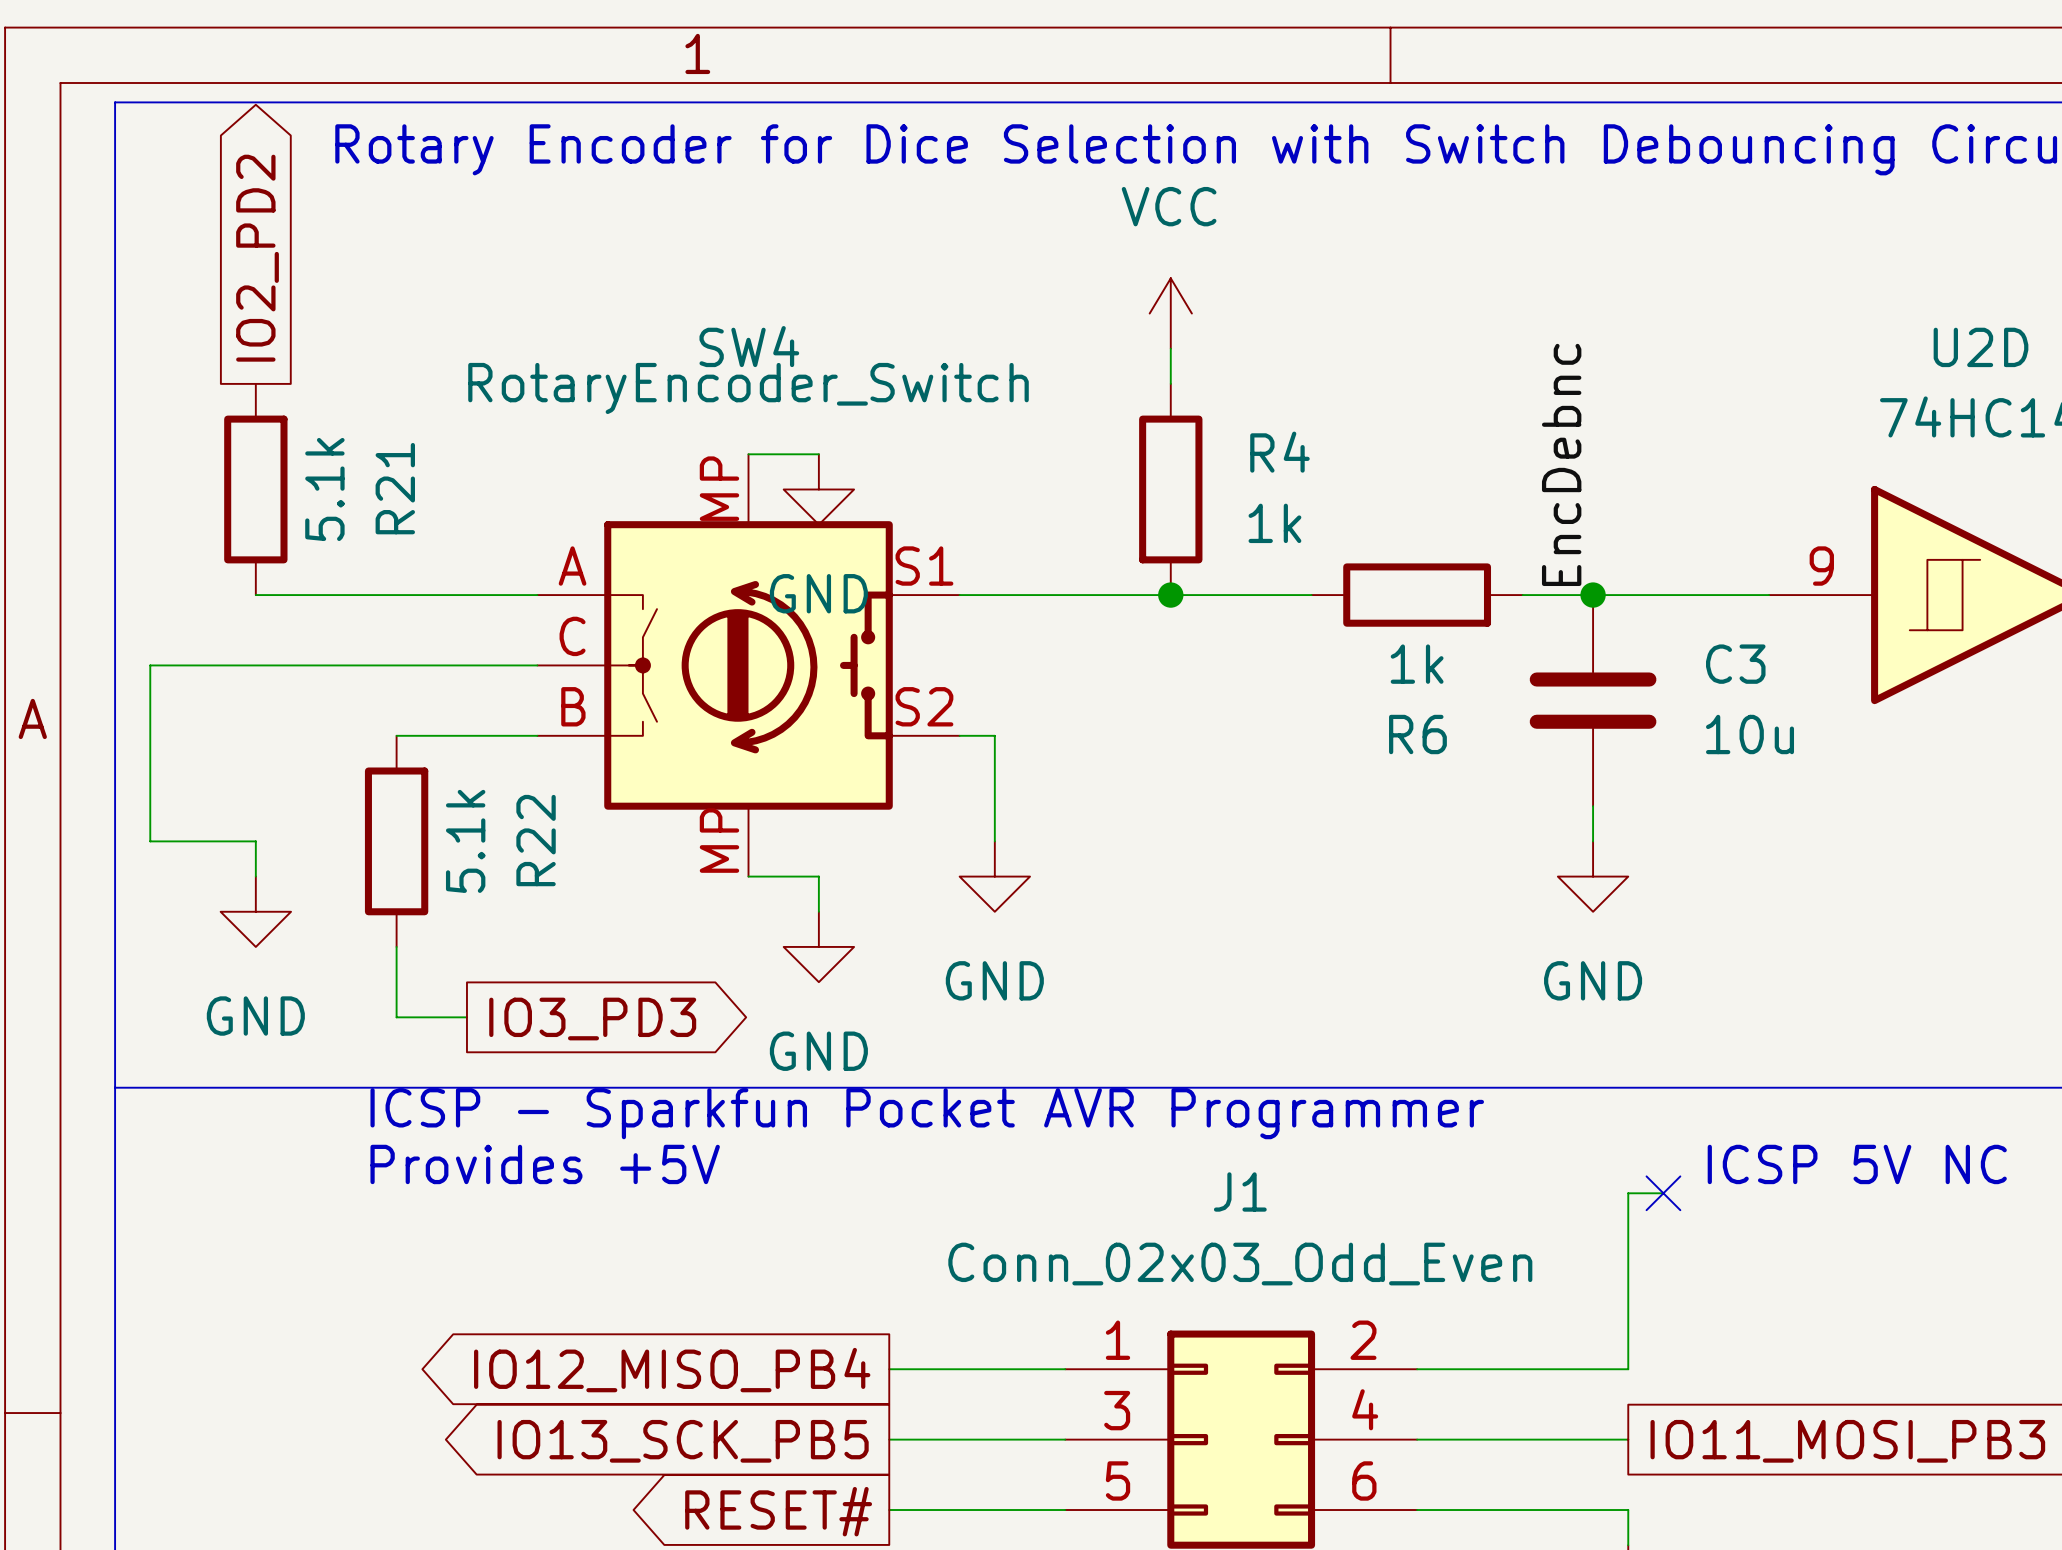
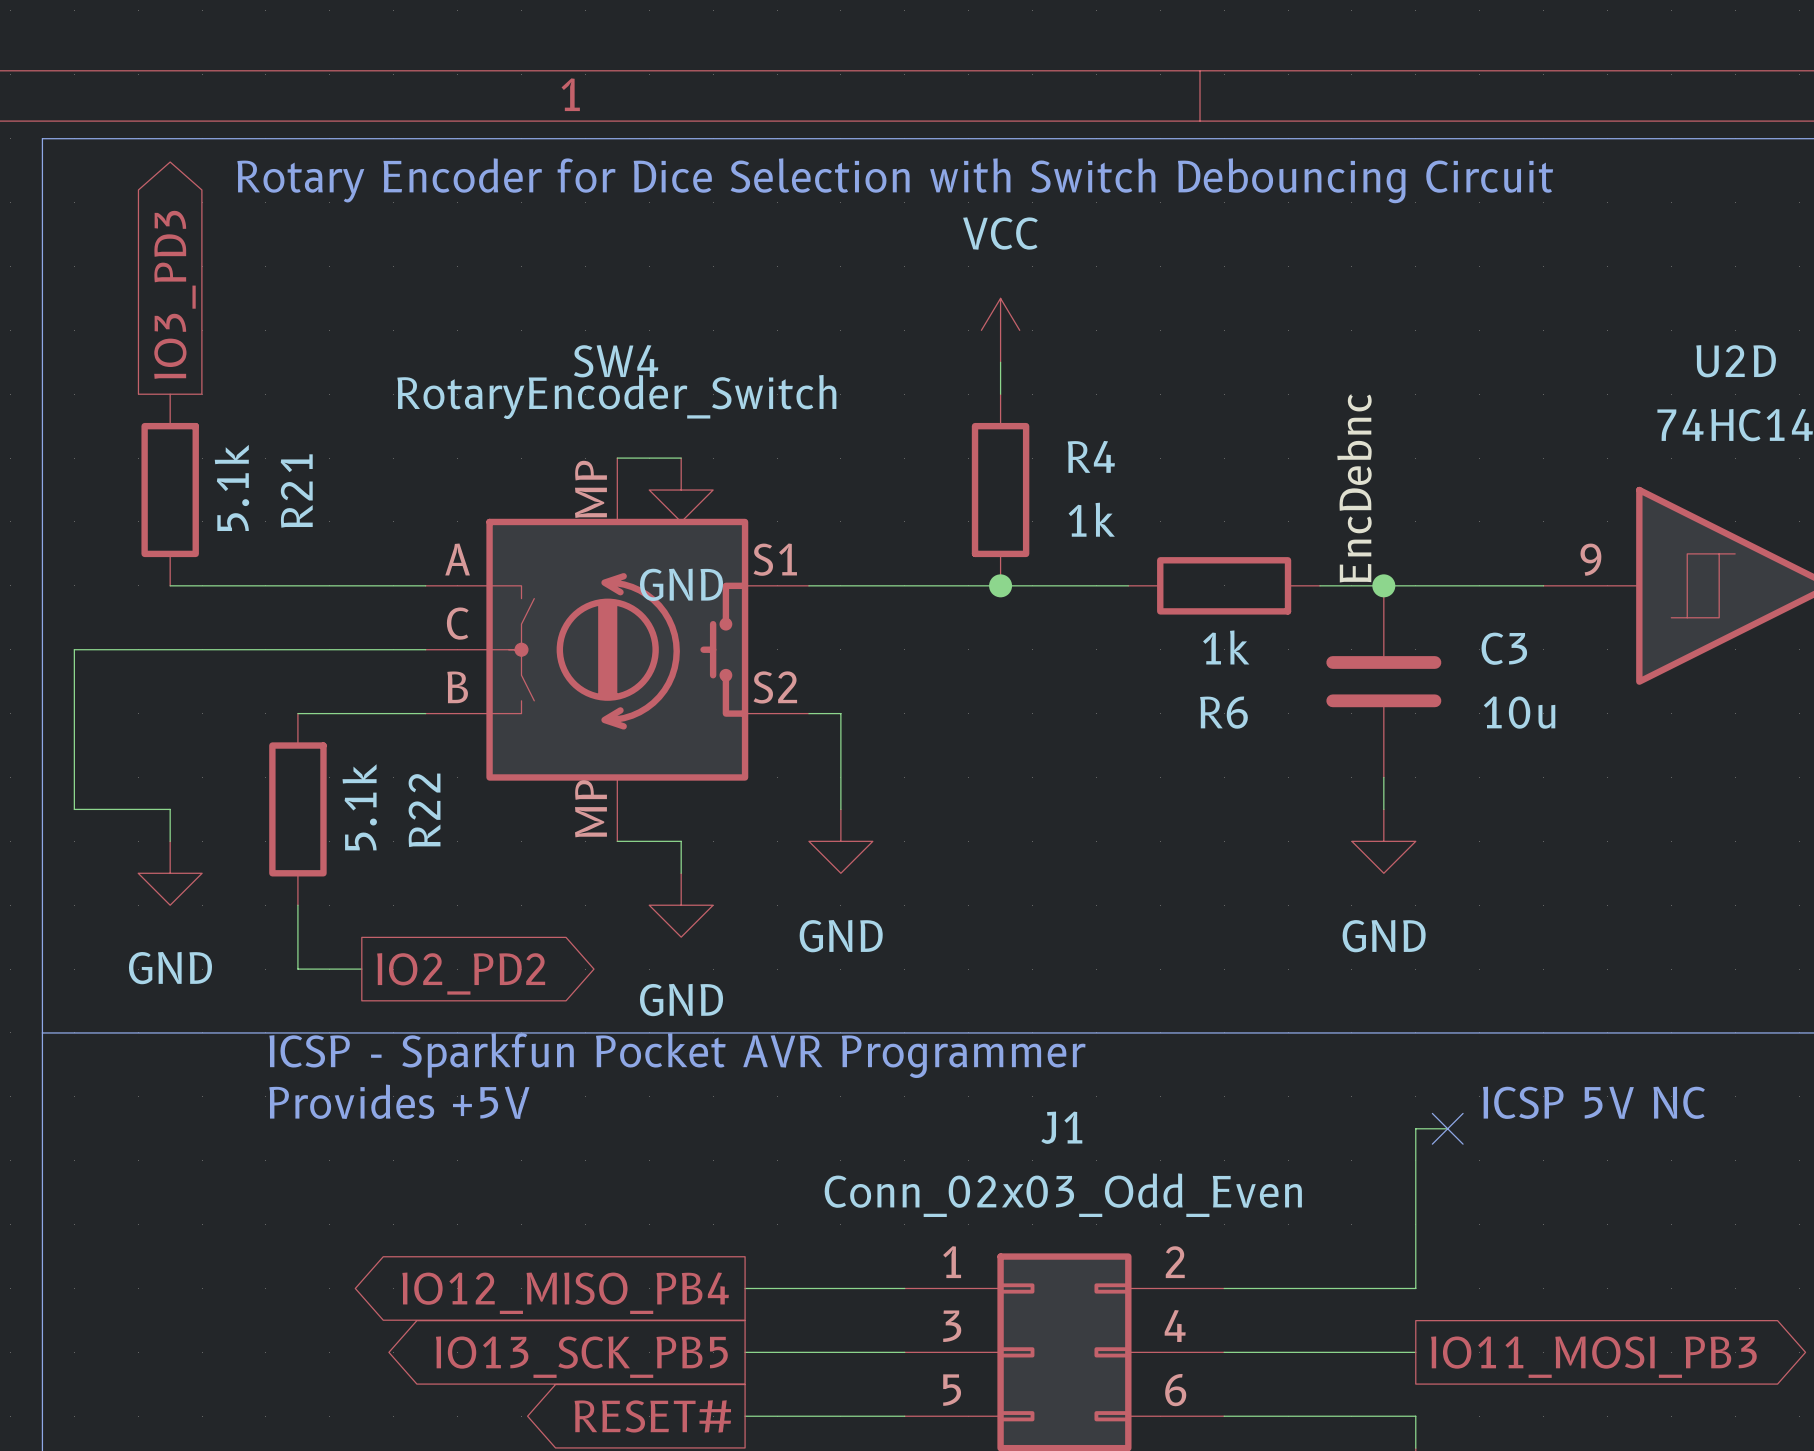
global label: IO2_PD2 (257, 258) -> IO3_PD3 (174, 294)
global label: IO3_PD3 (592, 1019) -> IO2_PD2 (461, 973)

